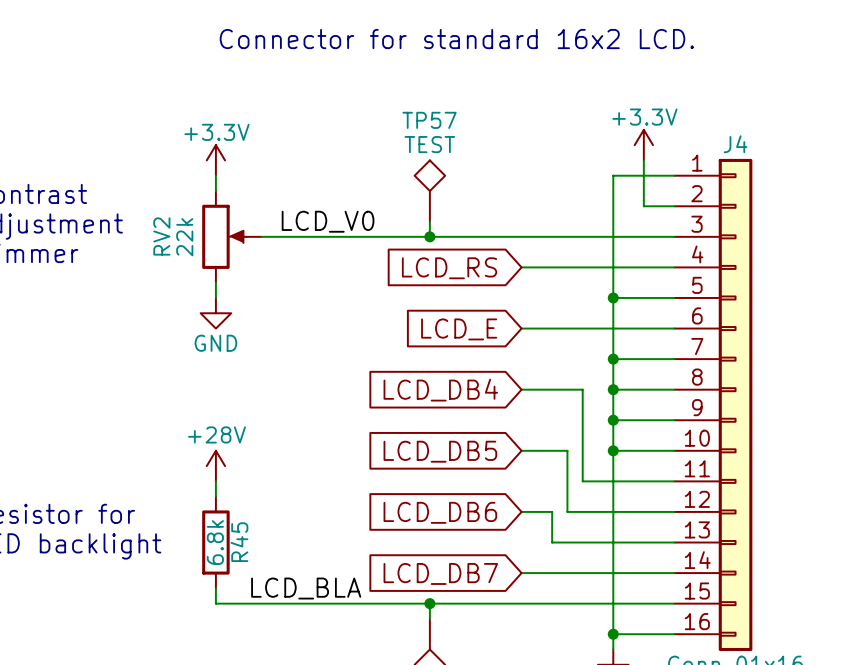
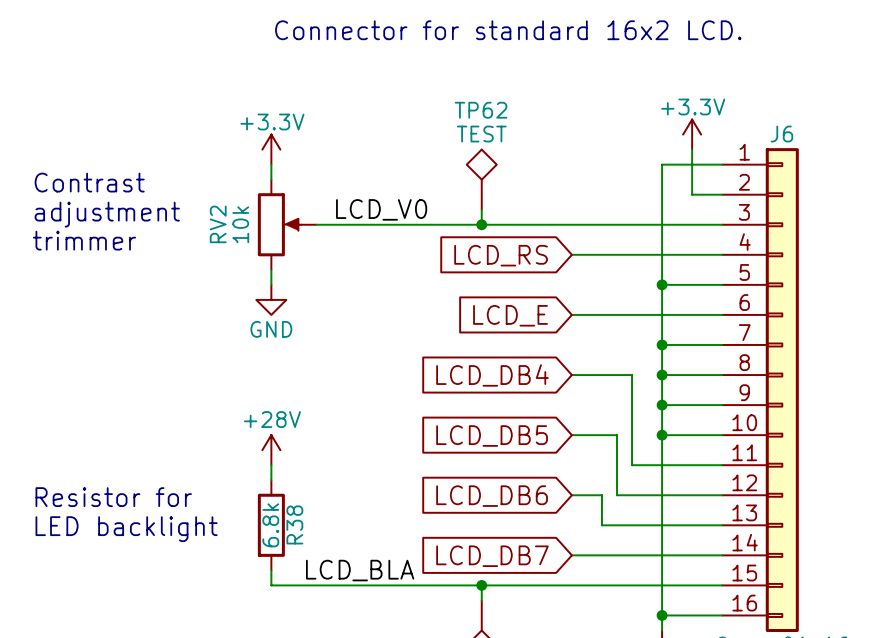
TP57 name: TP57 (429, 120) -> TP62 (481, 110)
J4 name: J4 (735, 144) -> J6 (781, 134)
RV2 value: 22k (184, 237) -> 10k (240, 224)
R45 name: R45 (239, 542) -> R38 (294, 524)

